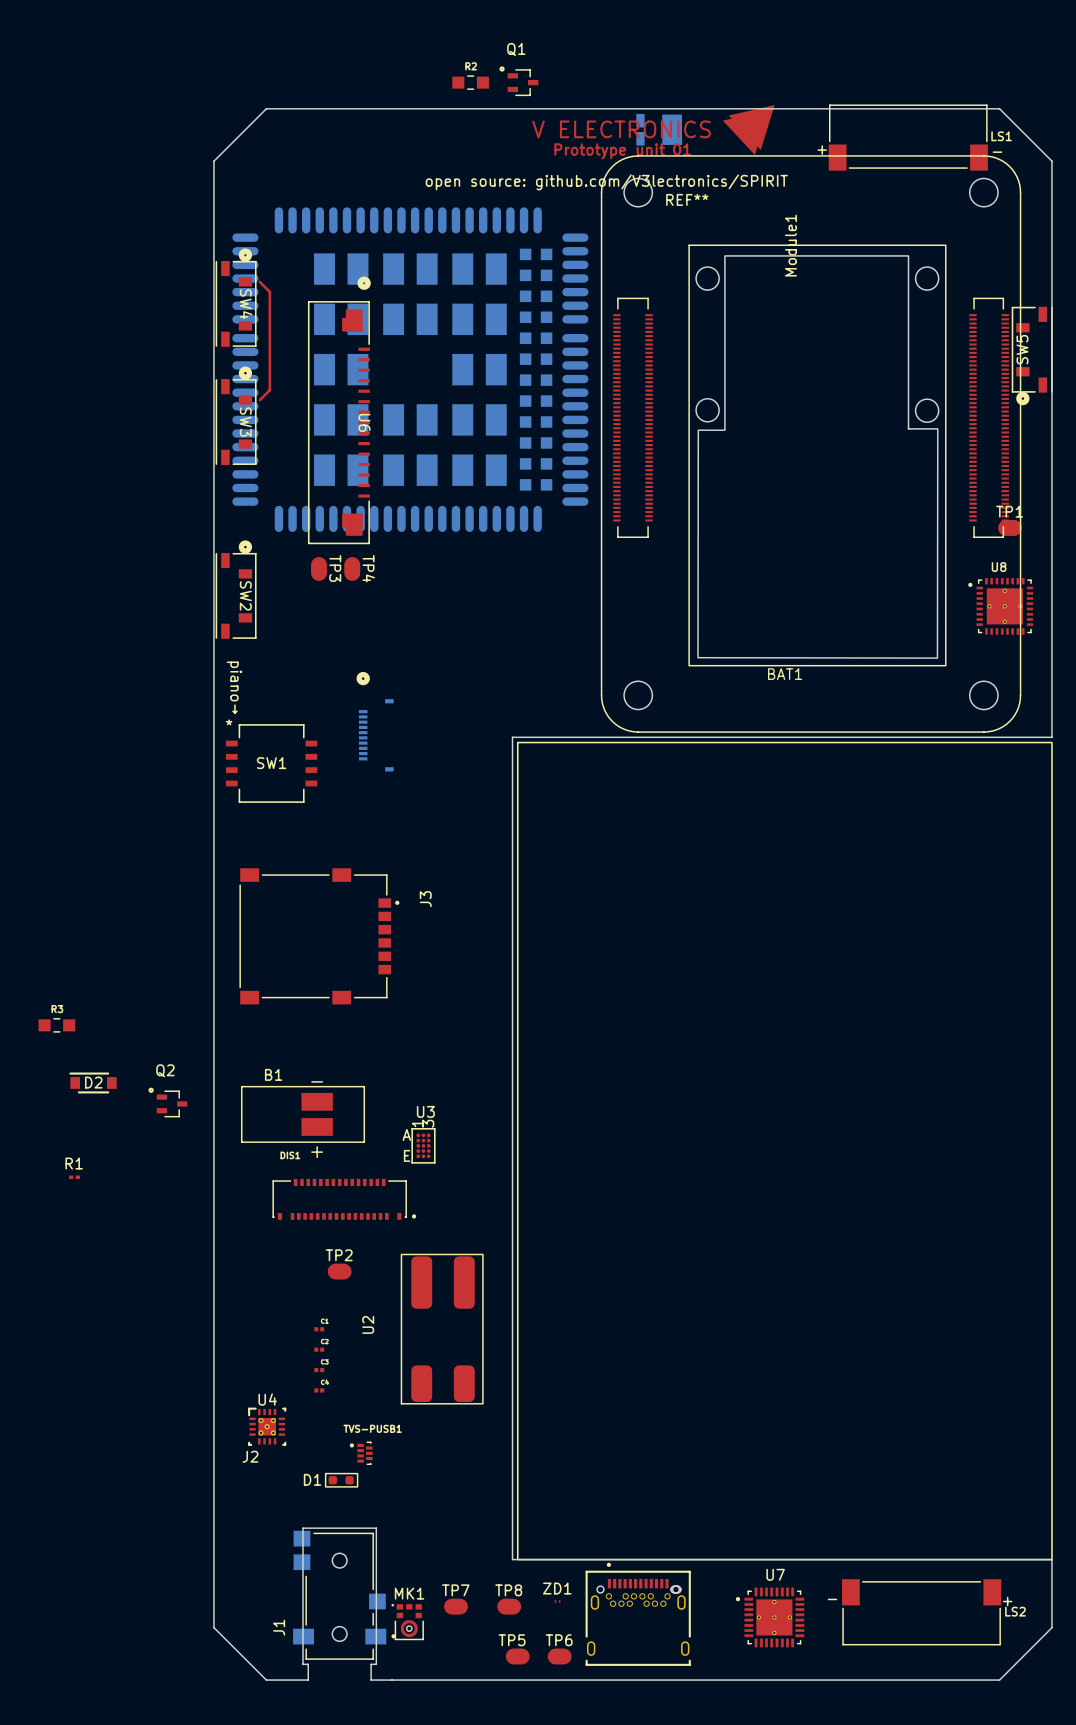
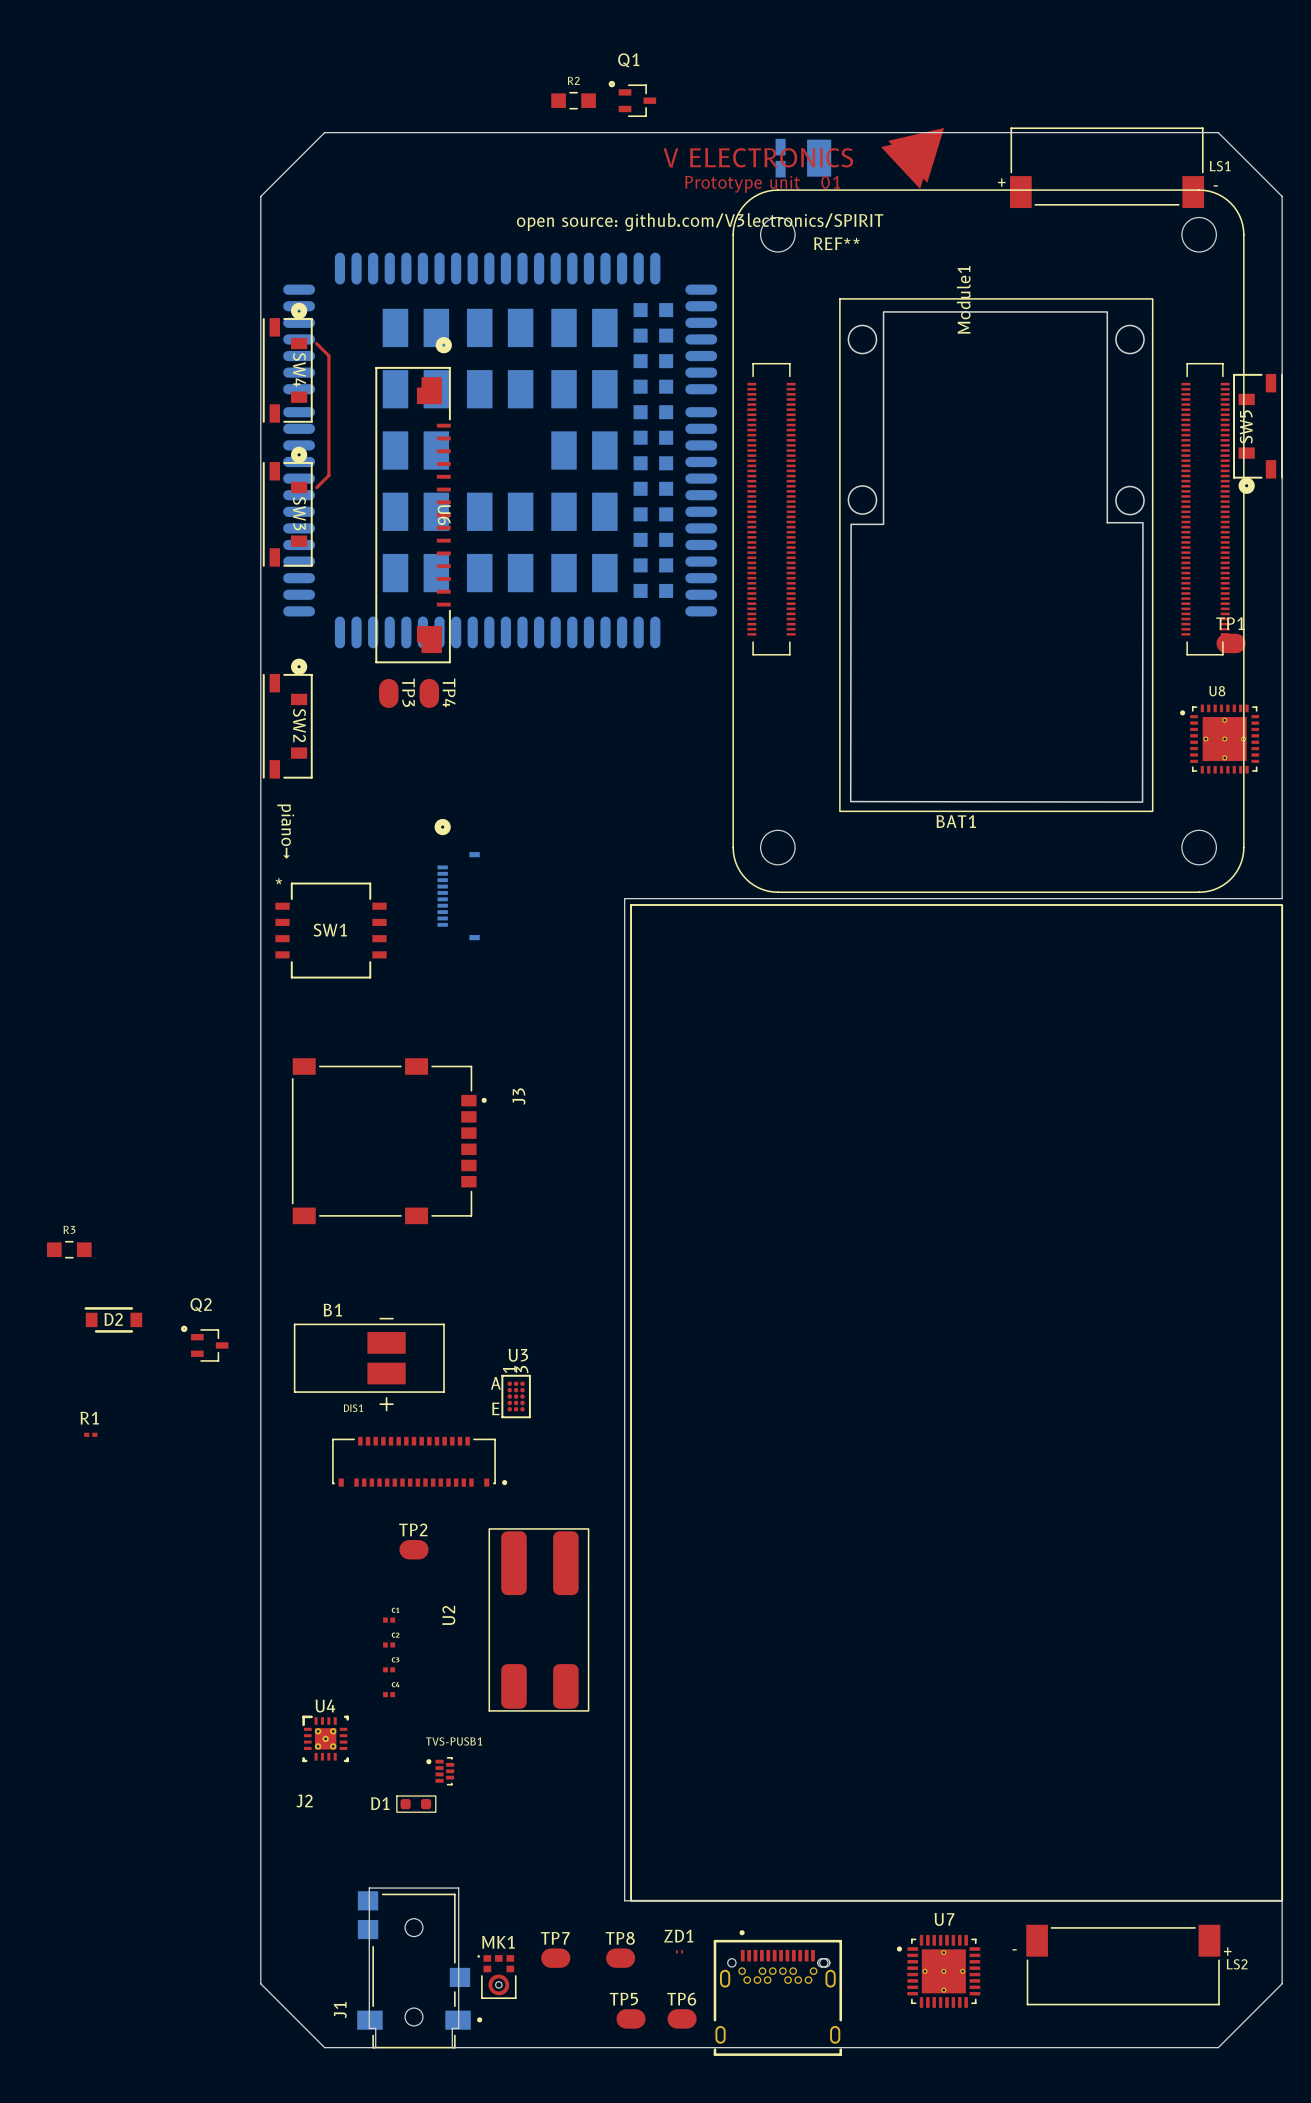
board edge: (303, 1549) (303, 1528) (376, 1528) (376, 1549) -> (369, 1888) (458, 1888)
J1 position: (344, 1595) -> (419, 1969)
J2 position: (638, 1614) -> (777, 1993)

